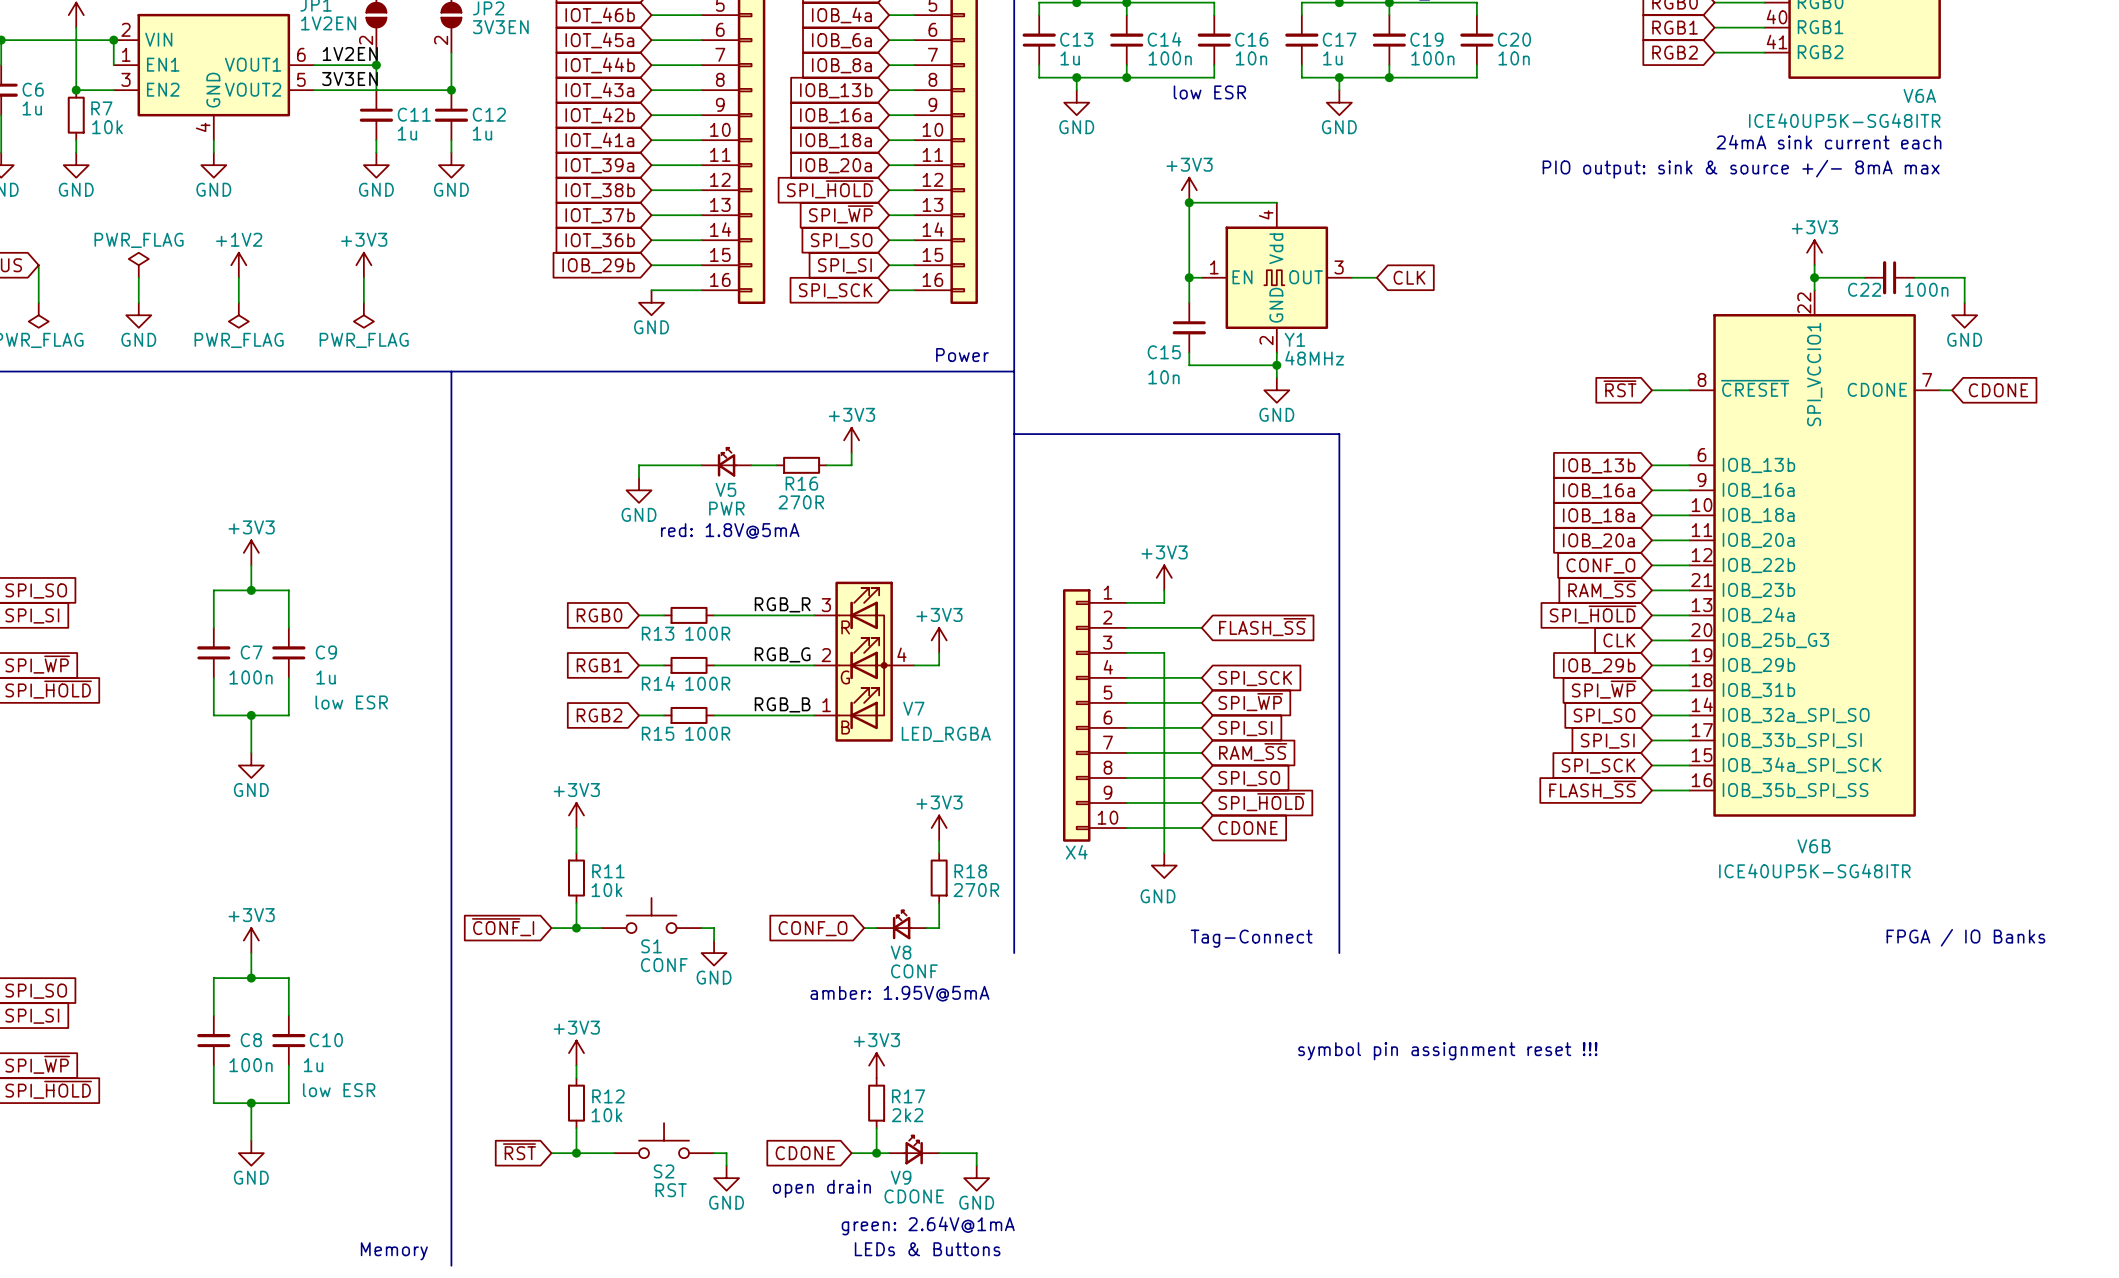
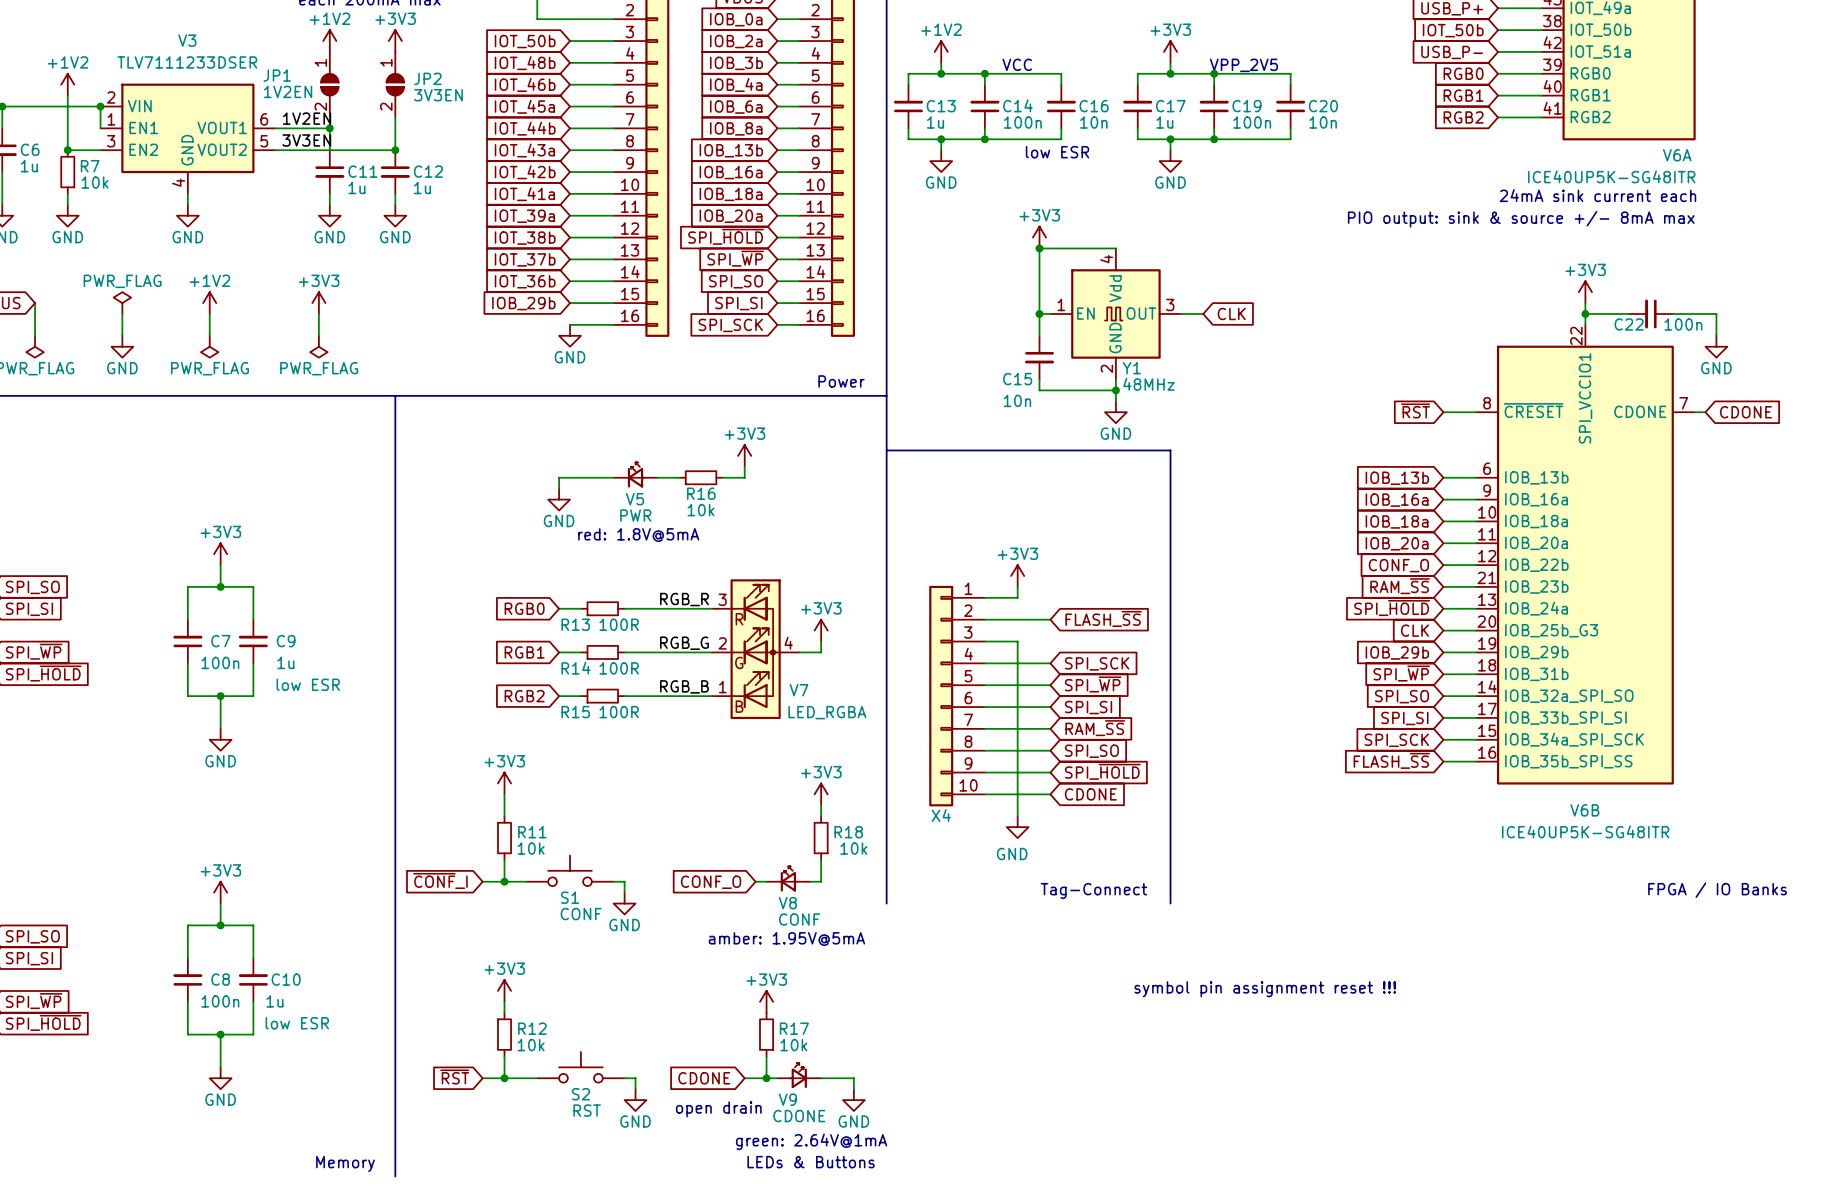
R16 value: 270R (801, 502) -> 10k (701, 510)
R18 value: 270R (976, 890) -> 10k (853, 848)
R17 value: 2k2 (907, 1115) -> 10k (793, 1045)

